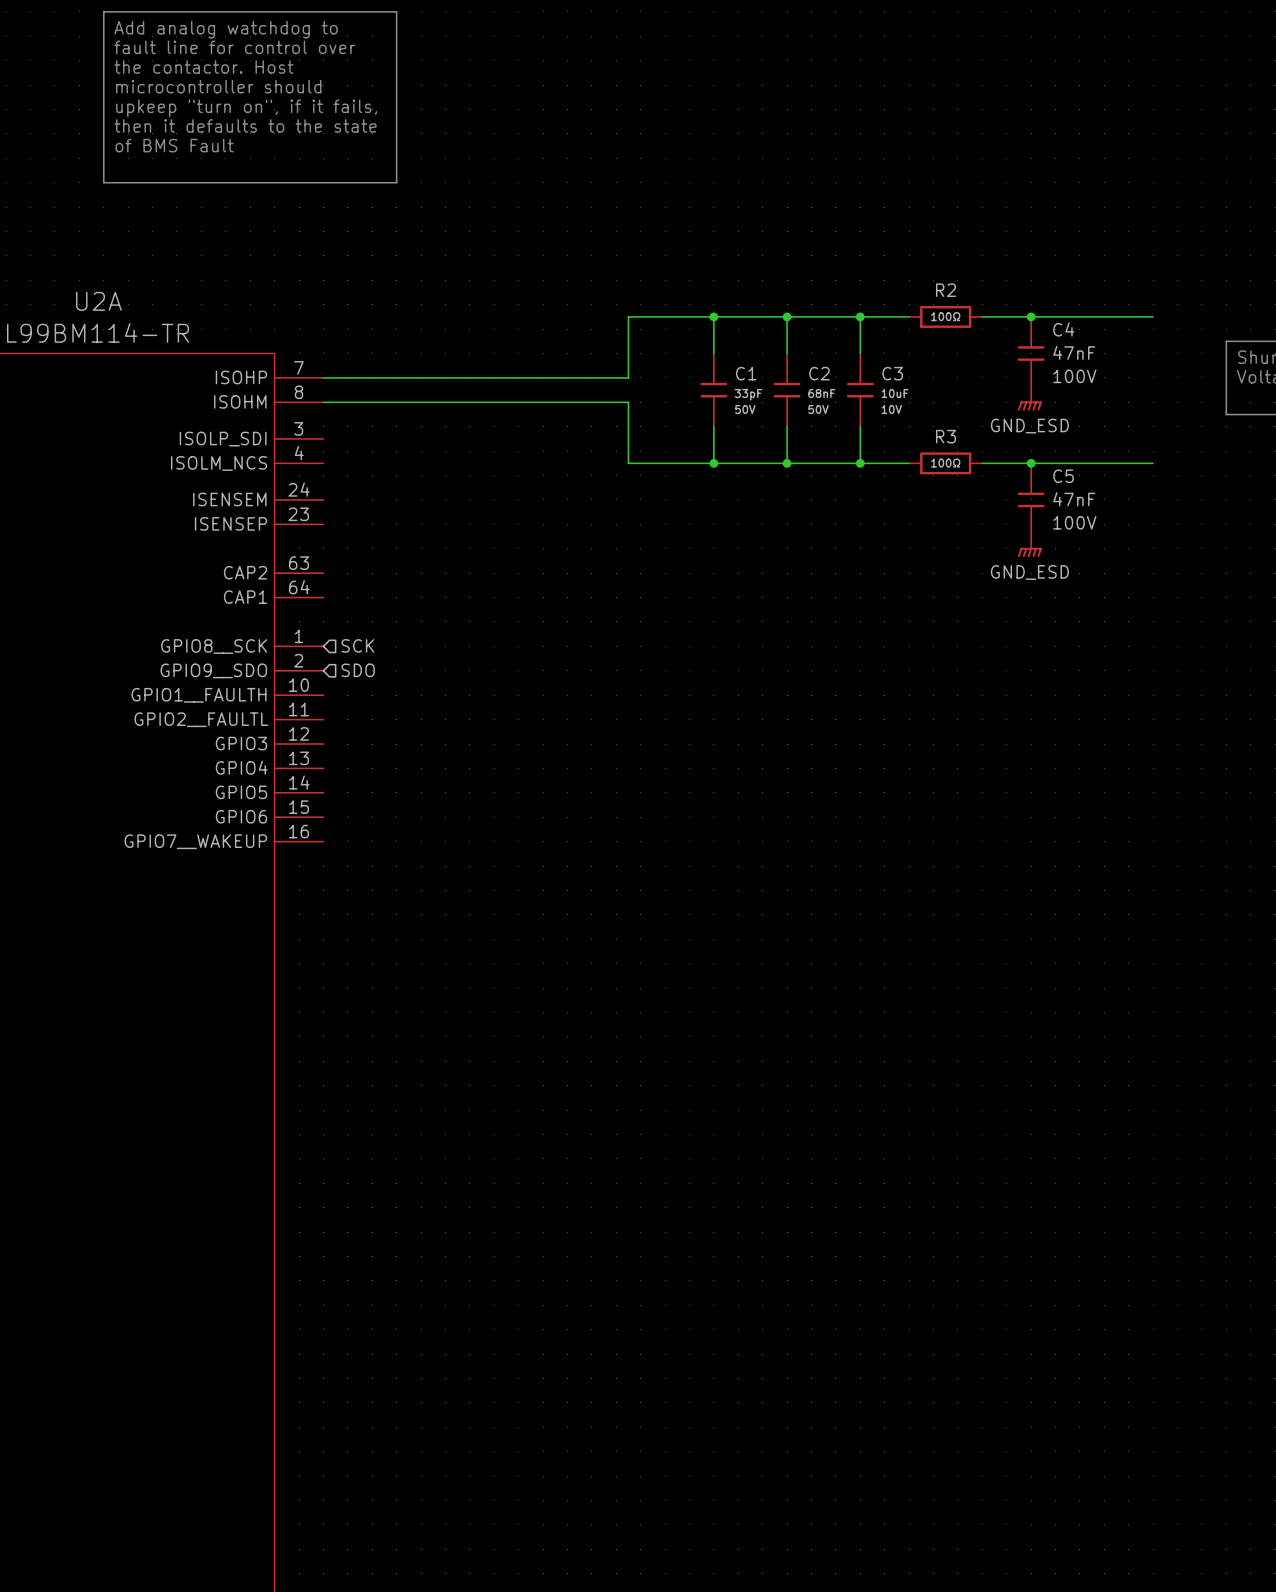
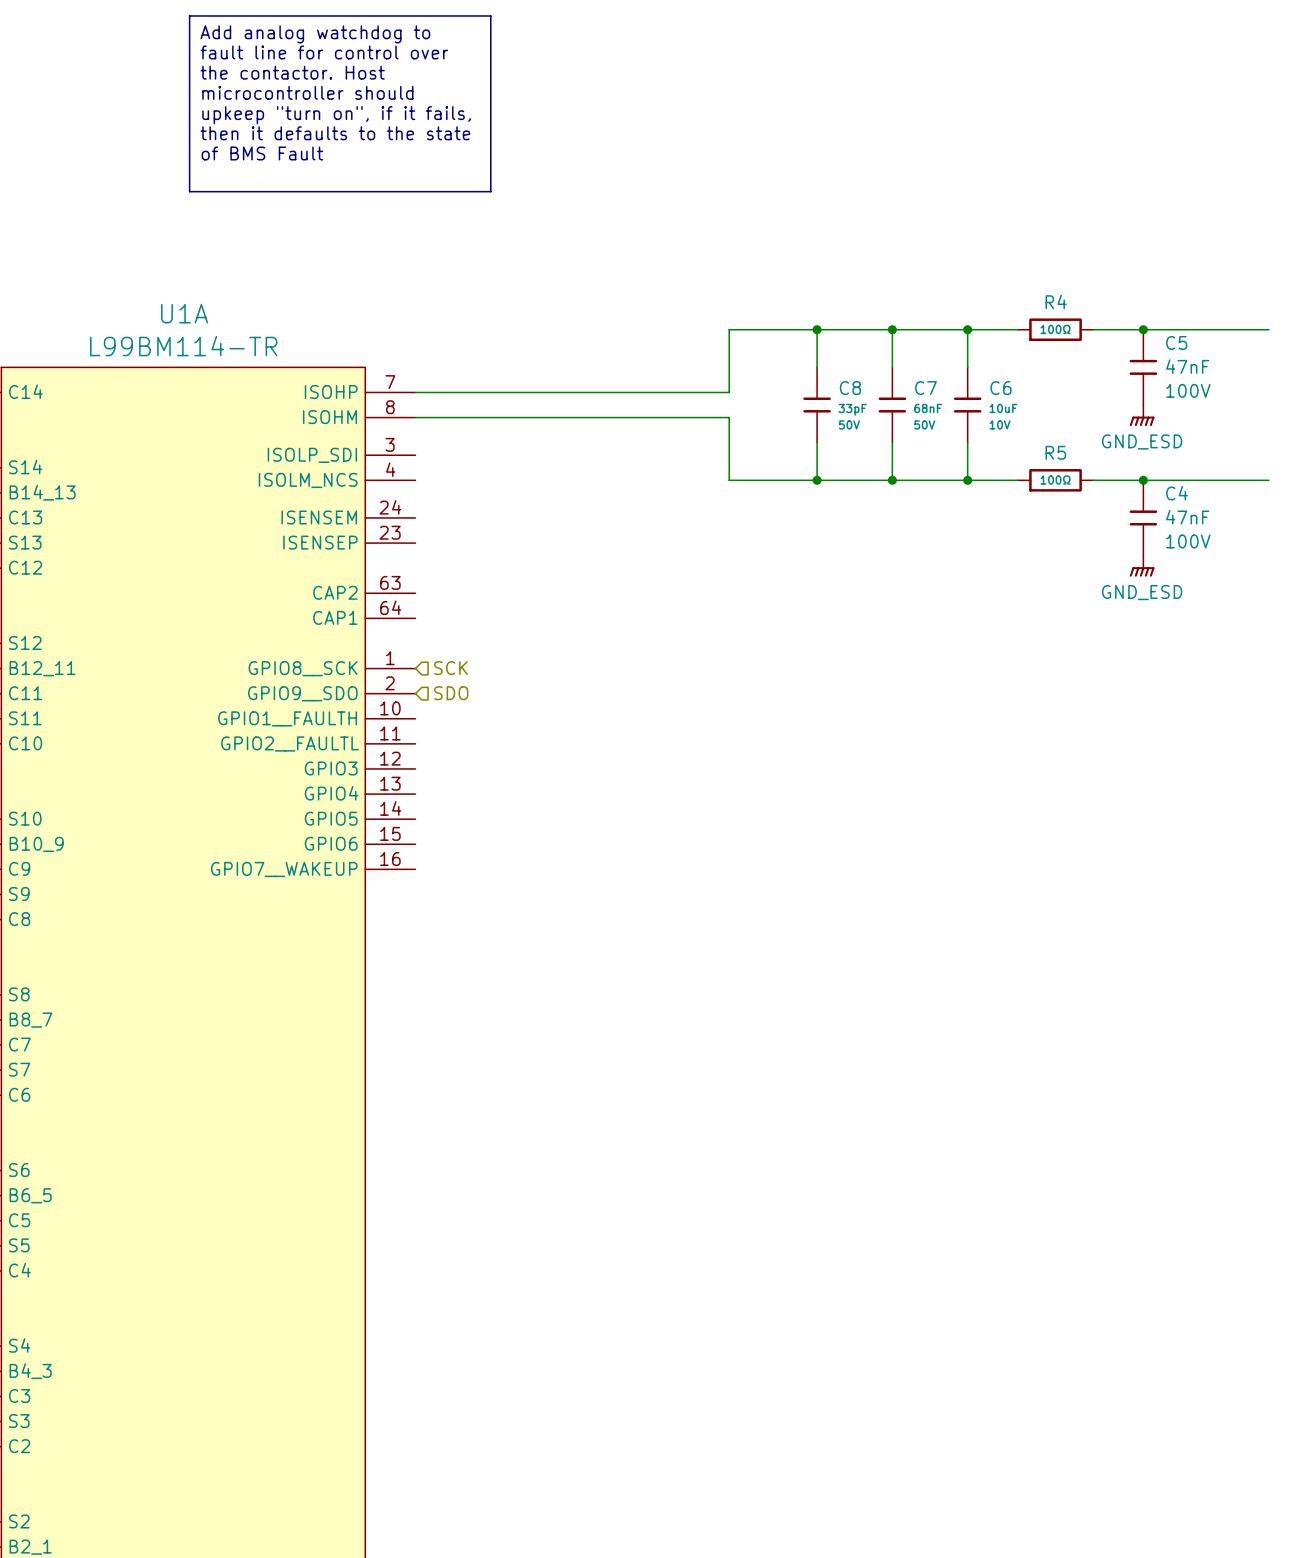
R2 name: R2 (946, 290) -> R4 (1056, 301)
U2A name: U2A (98, 301) -> U1A (184, 313)
C4 name: C4 (1063, 329) -> C5 (1176, 342)
C1 name: C1 (746, 373) -> C8 (850, 388)
C2 name: C2 (819, 373) -> C7 (926, 388)
C3 name: C3 (892, 373) -> C6 (1001, 388)
R3 name: R3 (946, 436) -> R5 (1055, 452)
C5 name: C5 (1063, 476) -> C4 (1176, 493)

